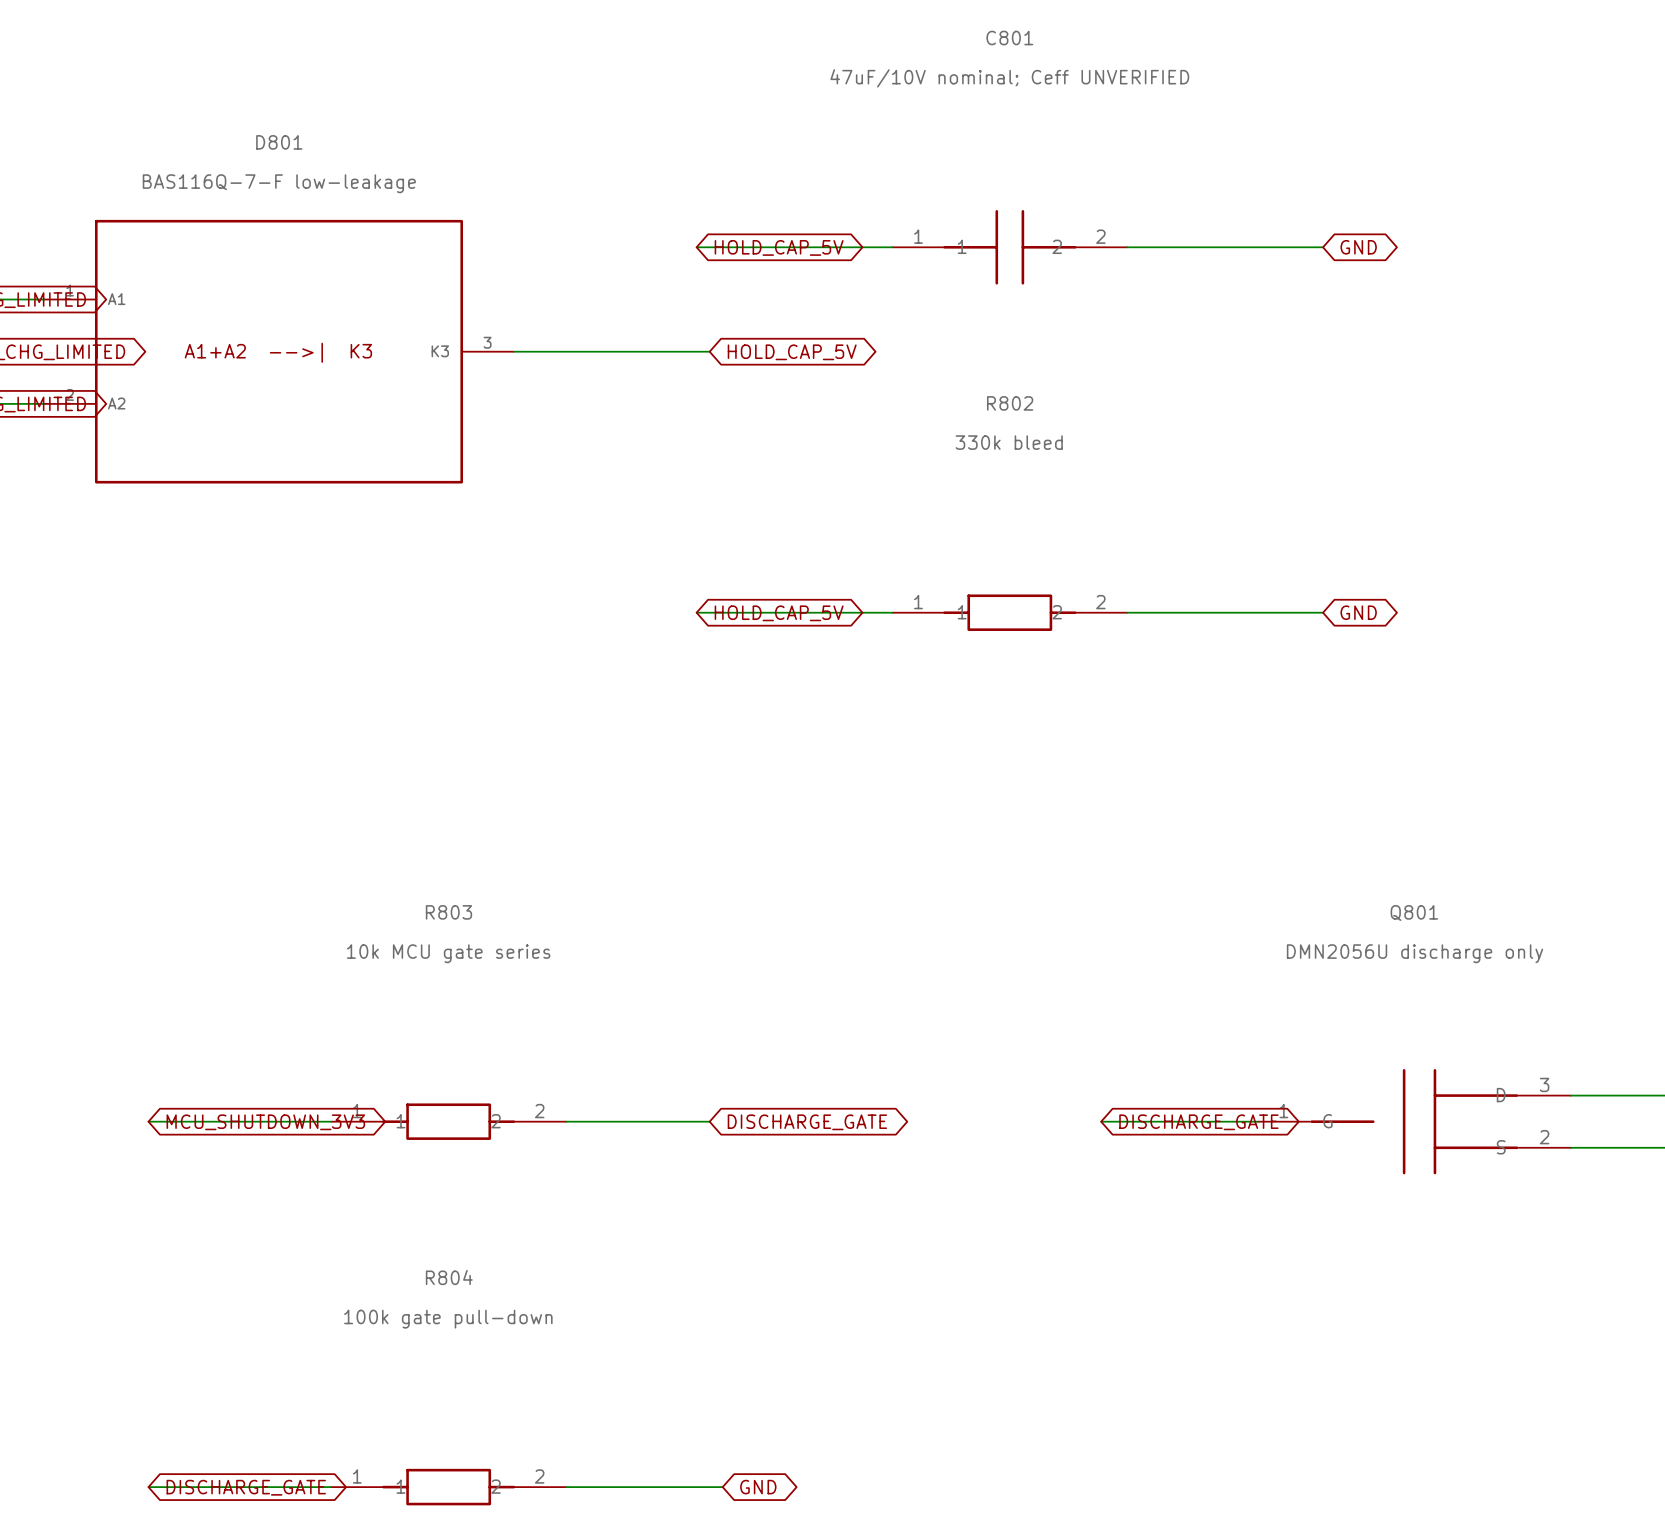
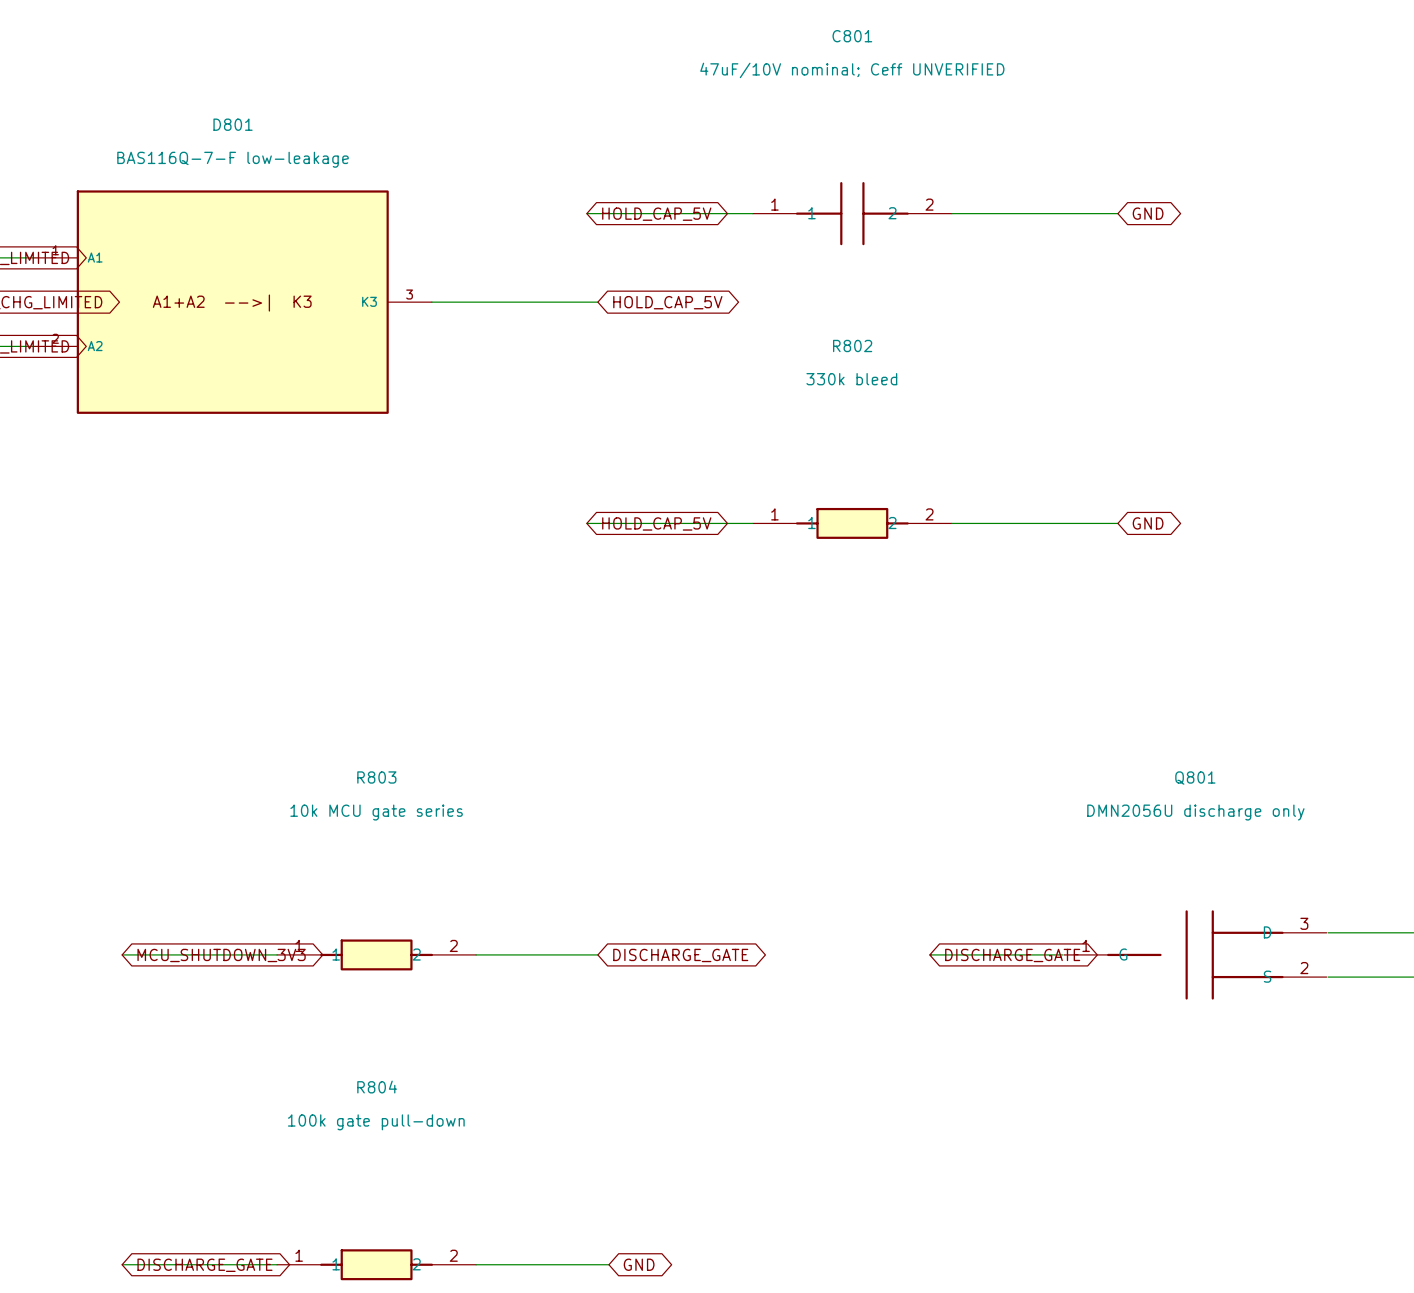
Q801 symbol: [1257, 1069, 1572, 1175] -> [1063, 910, 1327, 1000]

